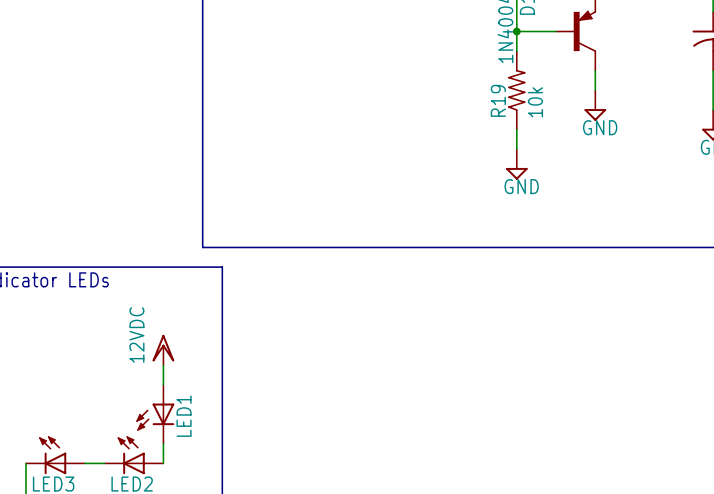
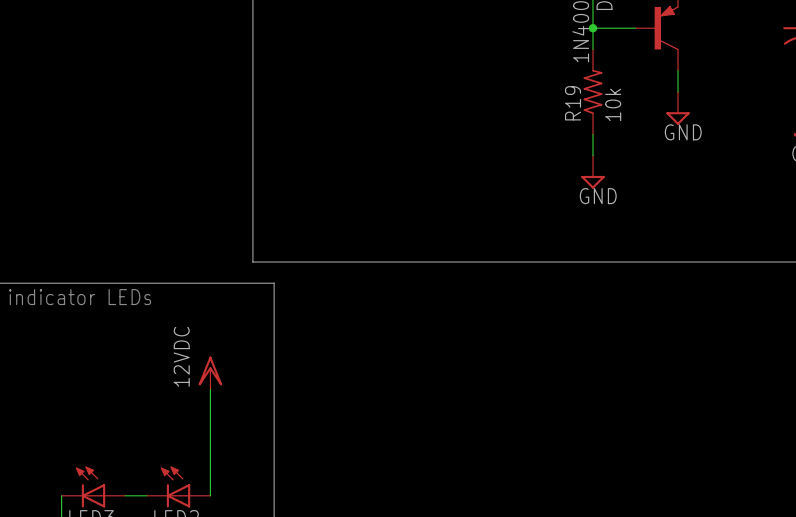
LED1: (155, 414) -> none

